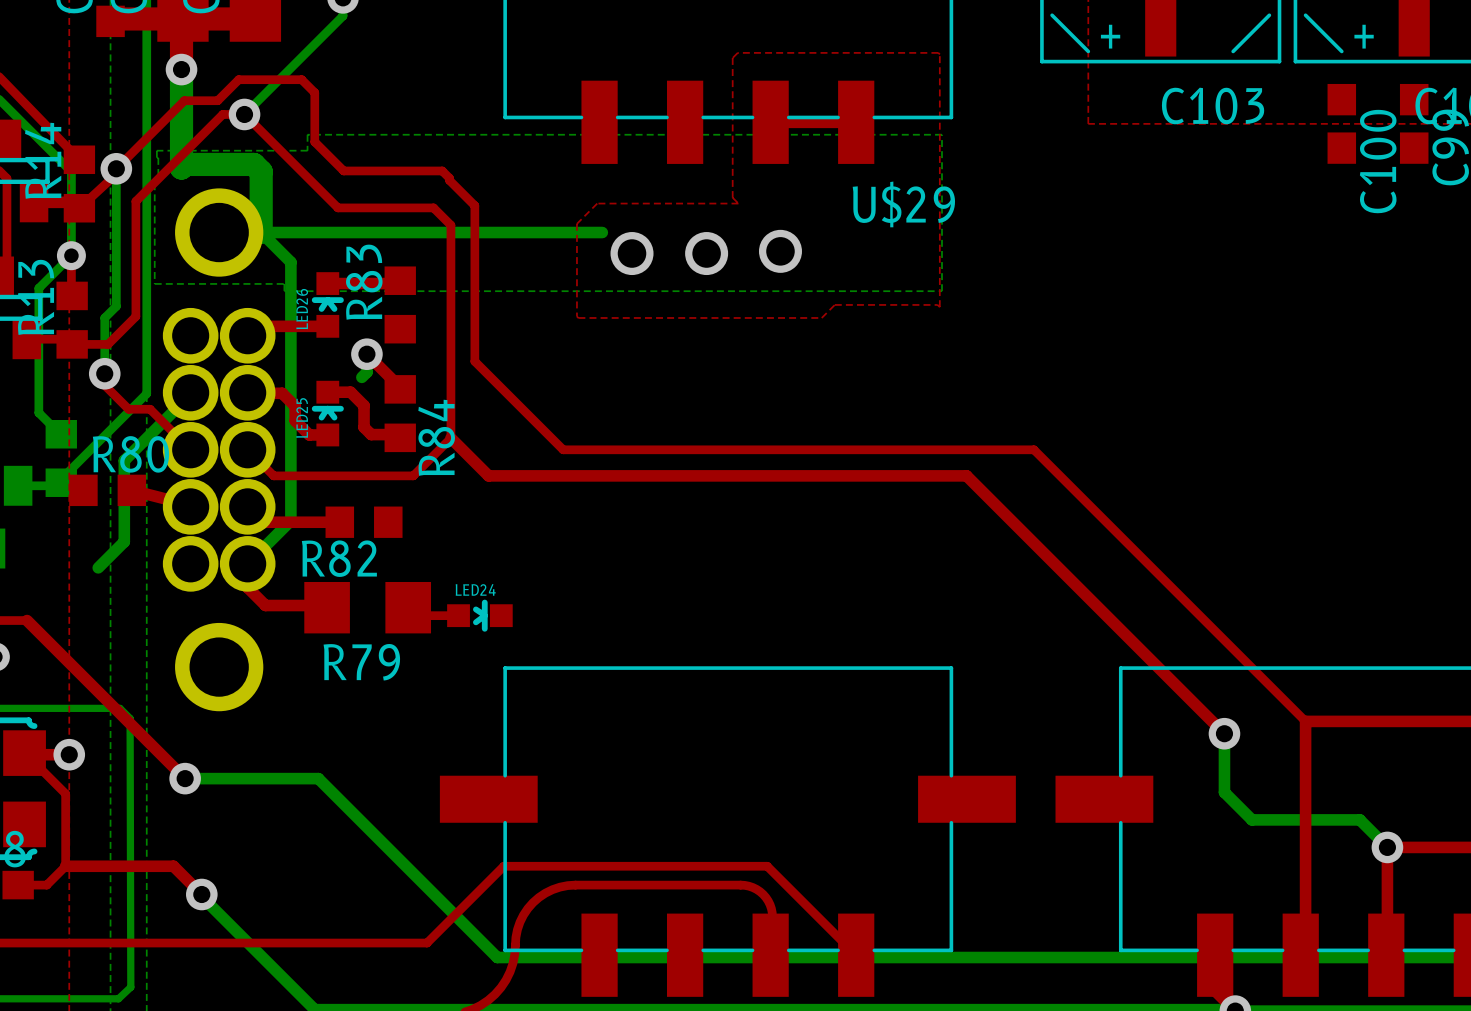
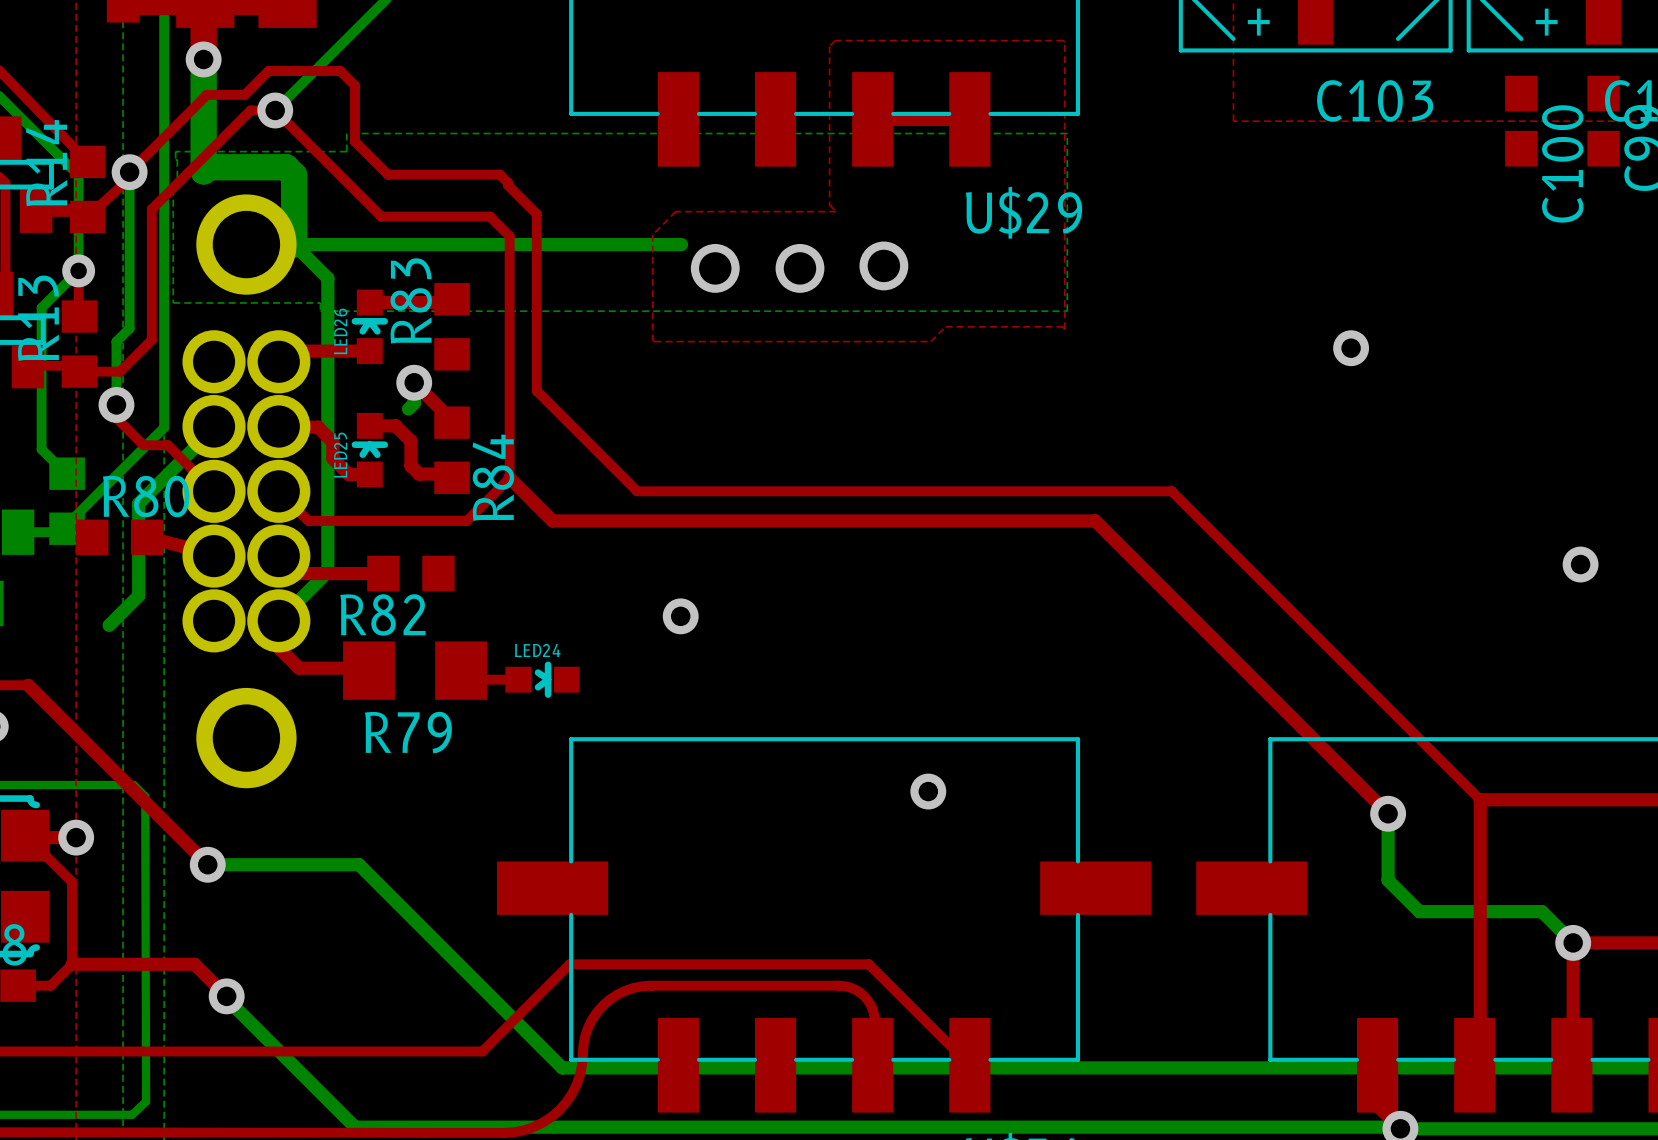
via: none -> (1351, 348)
via: none -> (1580, 564)
via: none -> (680, 616)
via: none -> (928, 791)

